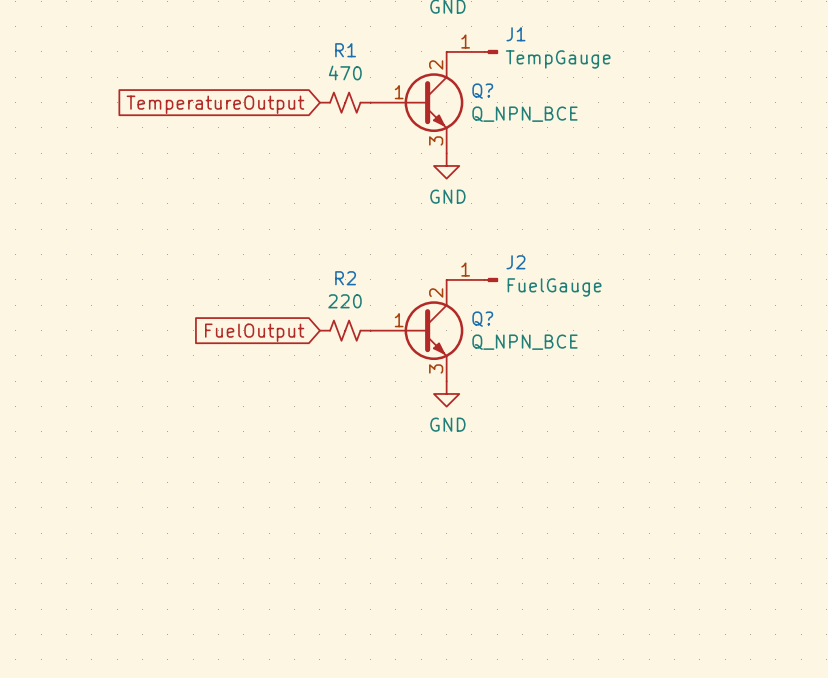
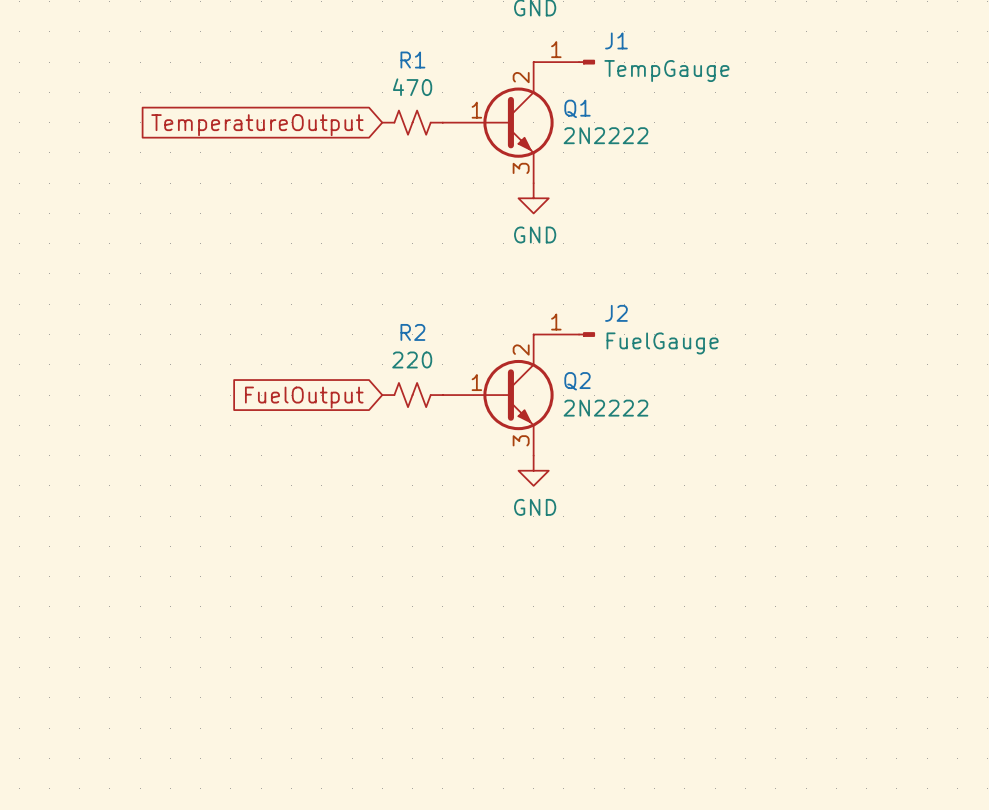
Q? name: Q? (482, 91) -> Q1 (577, 108)
Q? value: Q_NPN_BCE (524, 114) -> 2N2222 (605, 135)
Q? name: Q? (482, 319) -> Q2 (577, 381)
Q? value: Q_NPN_BCE (524, 342) -> 2N2222 (605, 408)

